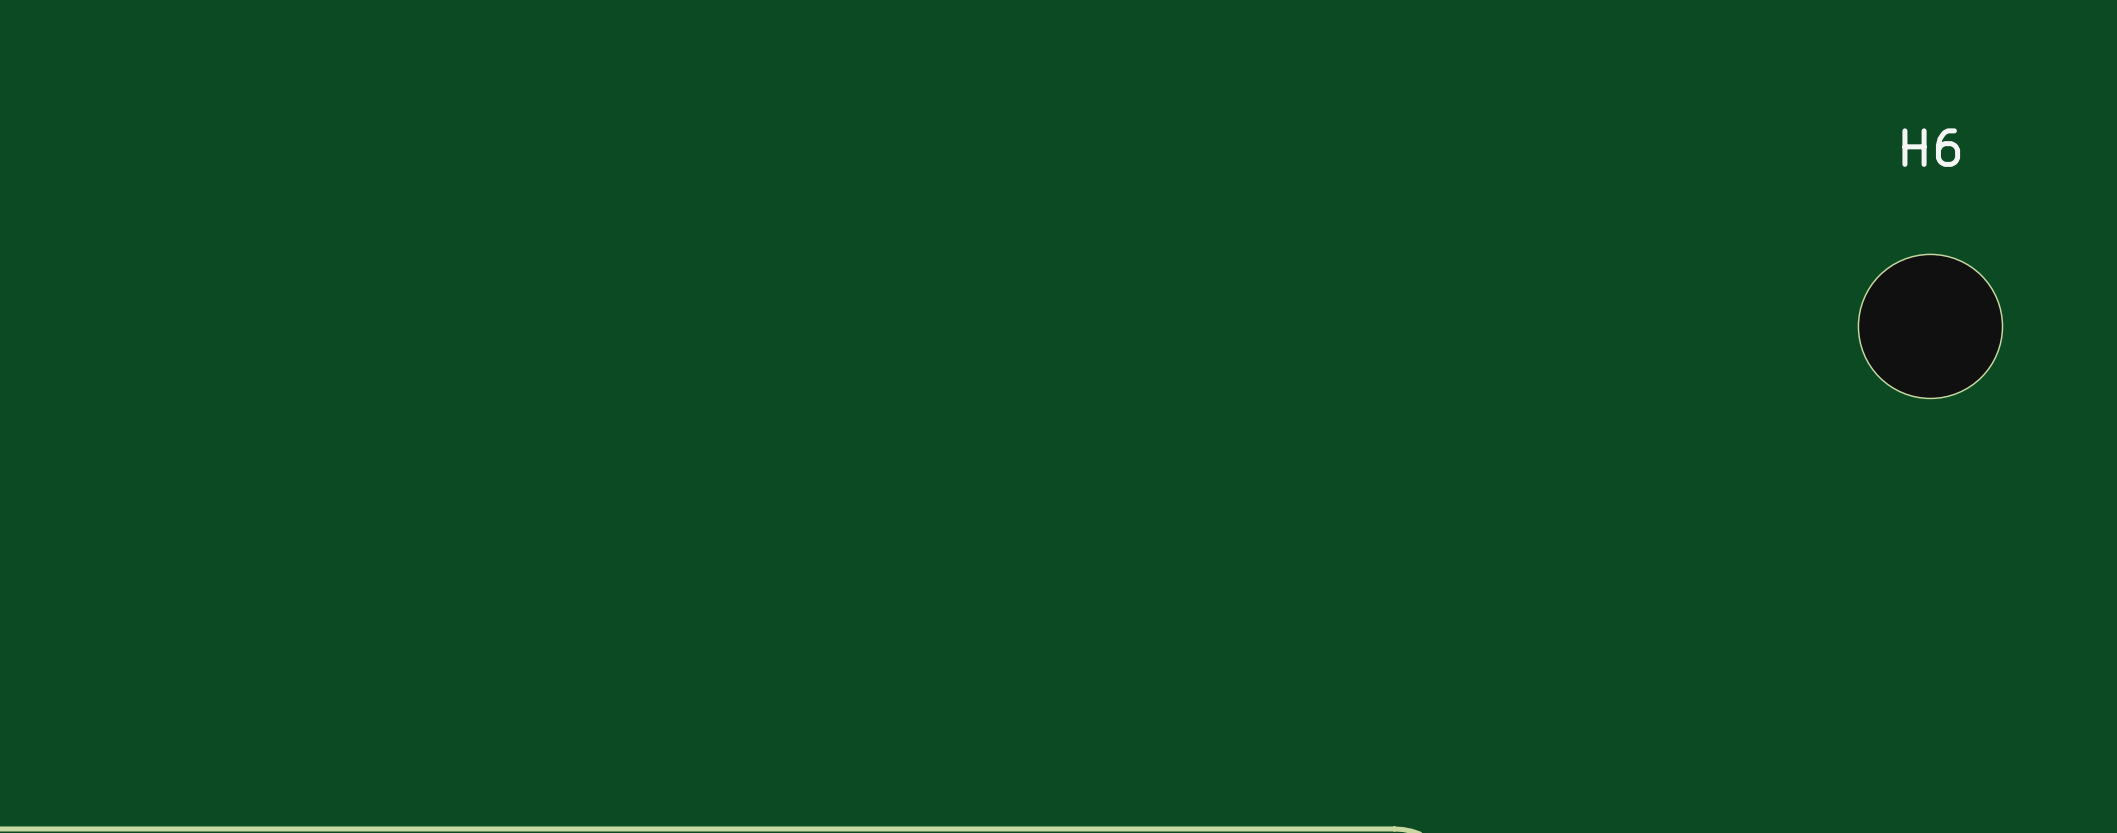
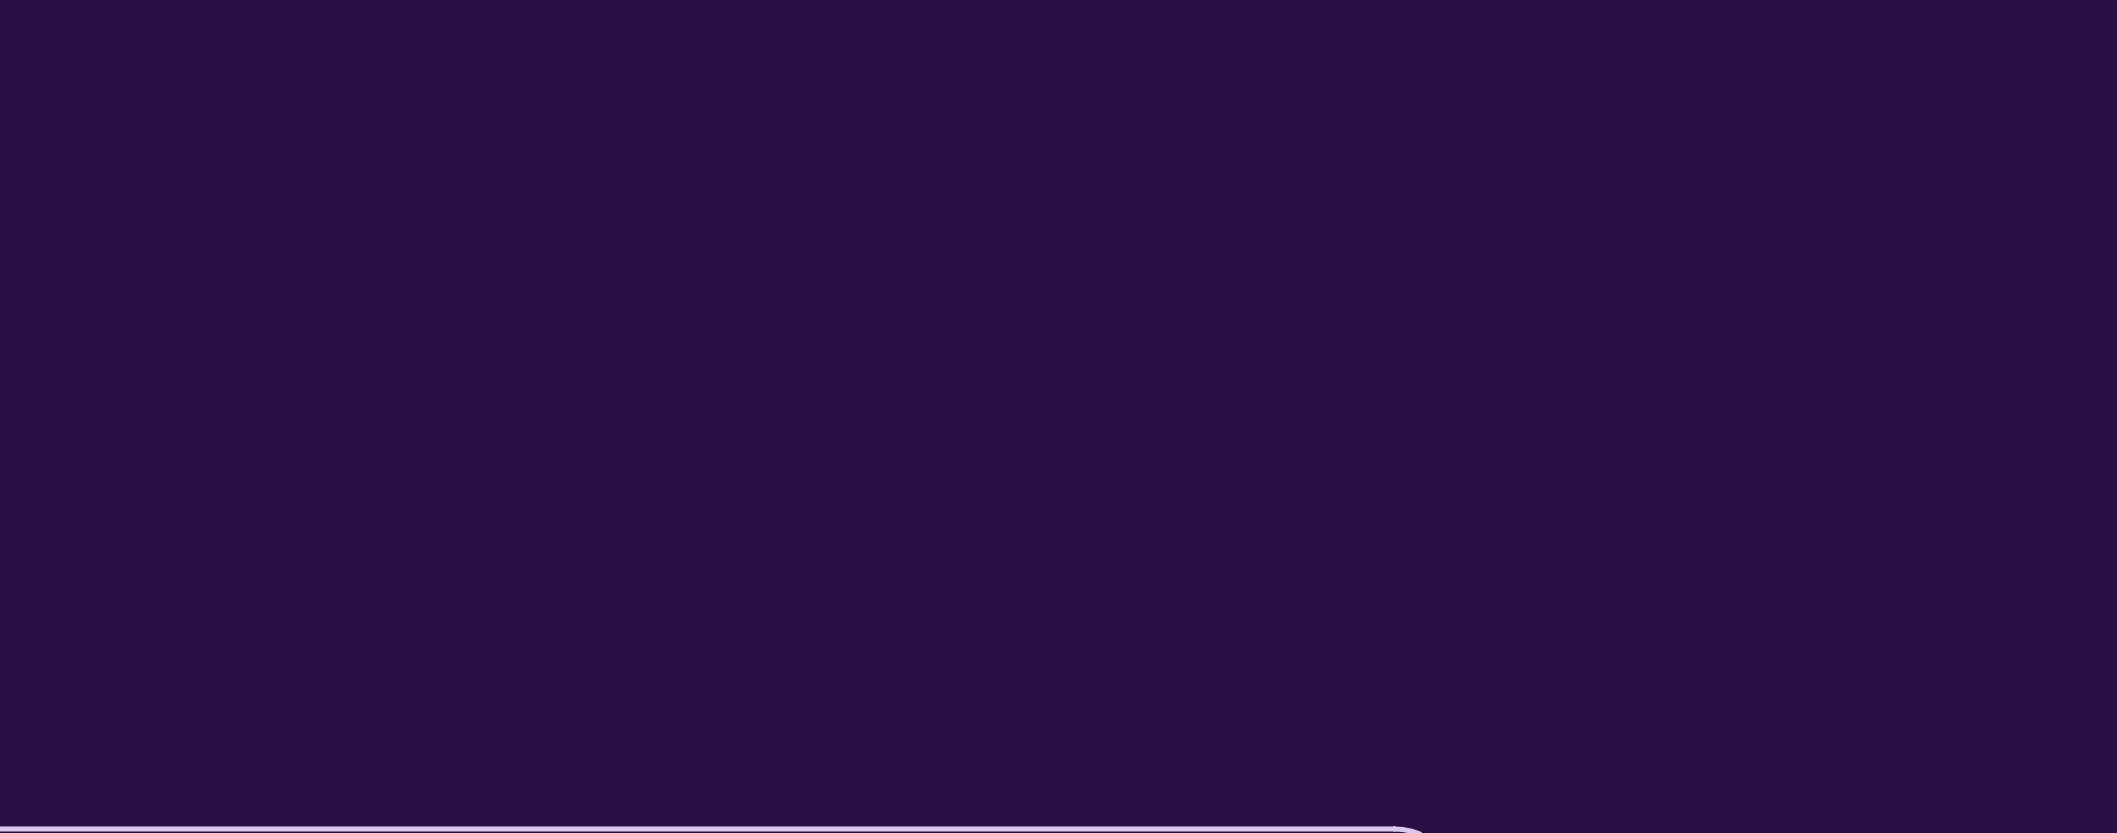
H6: (1930, 326) -> none

